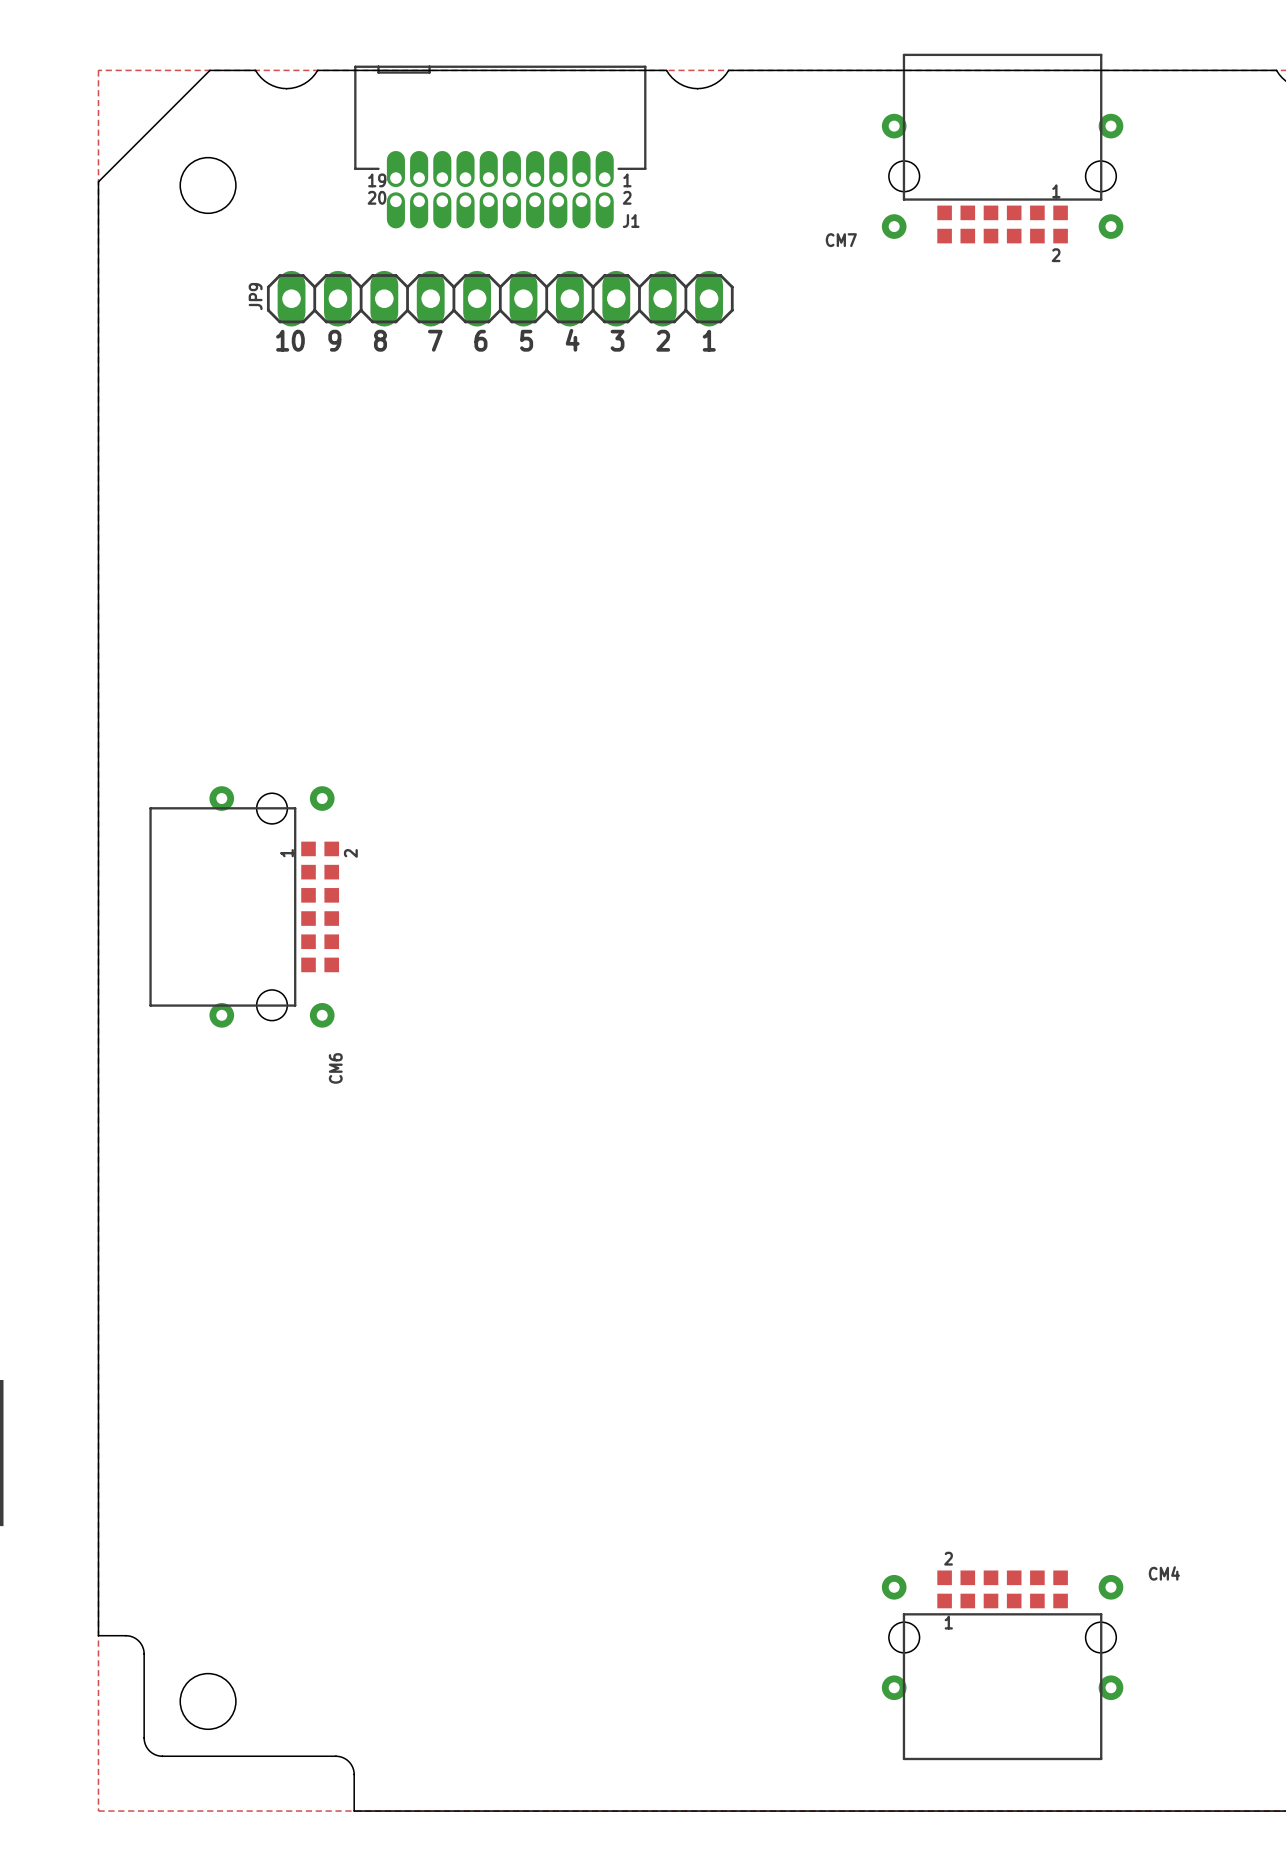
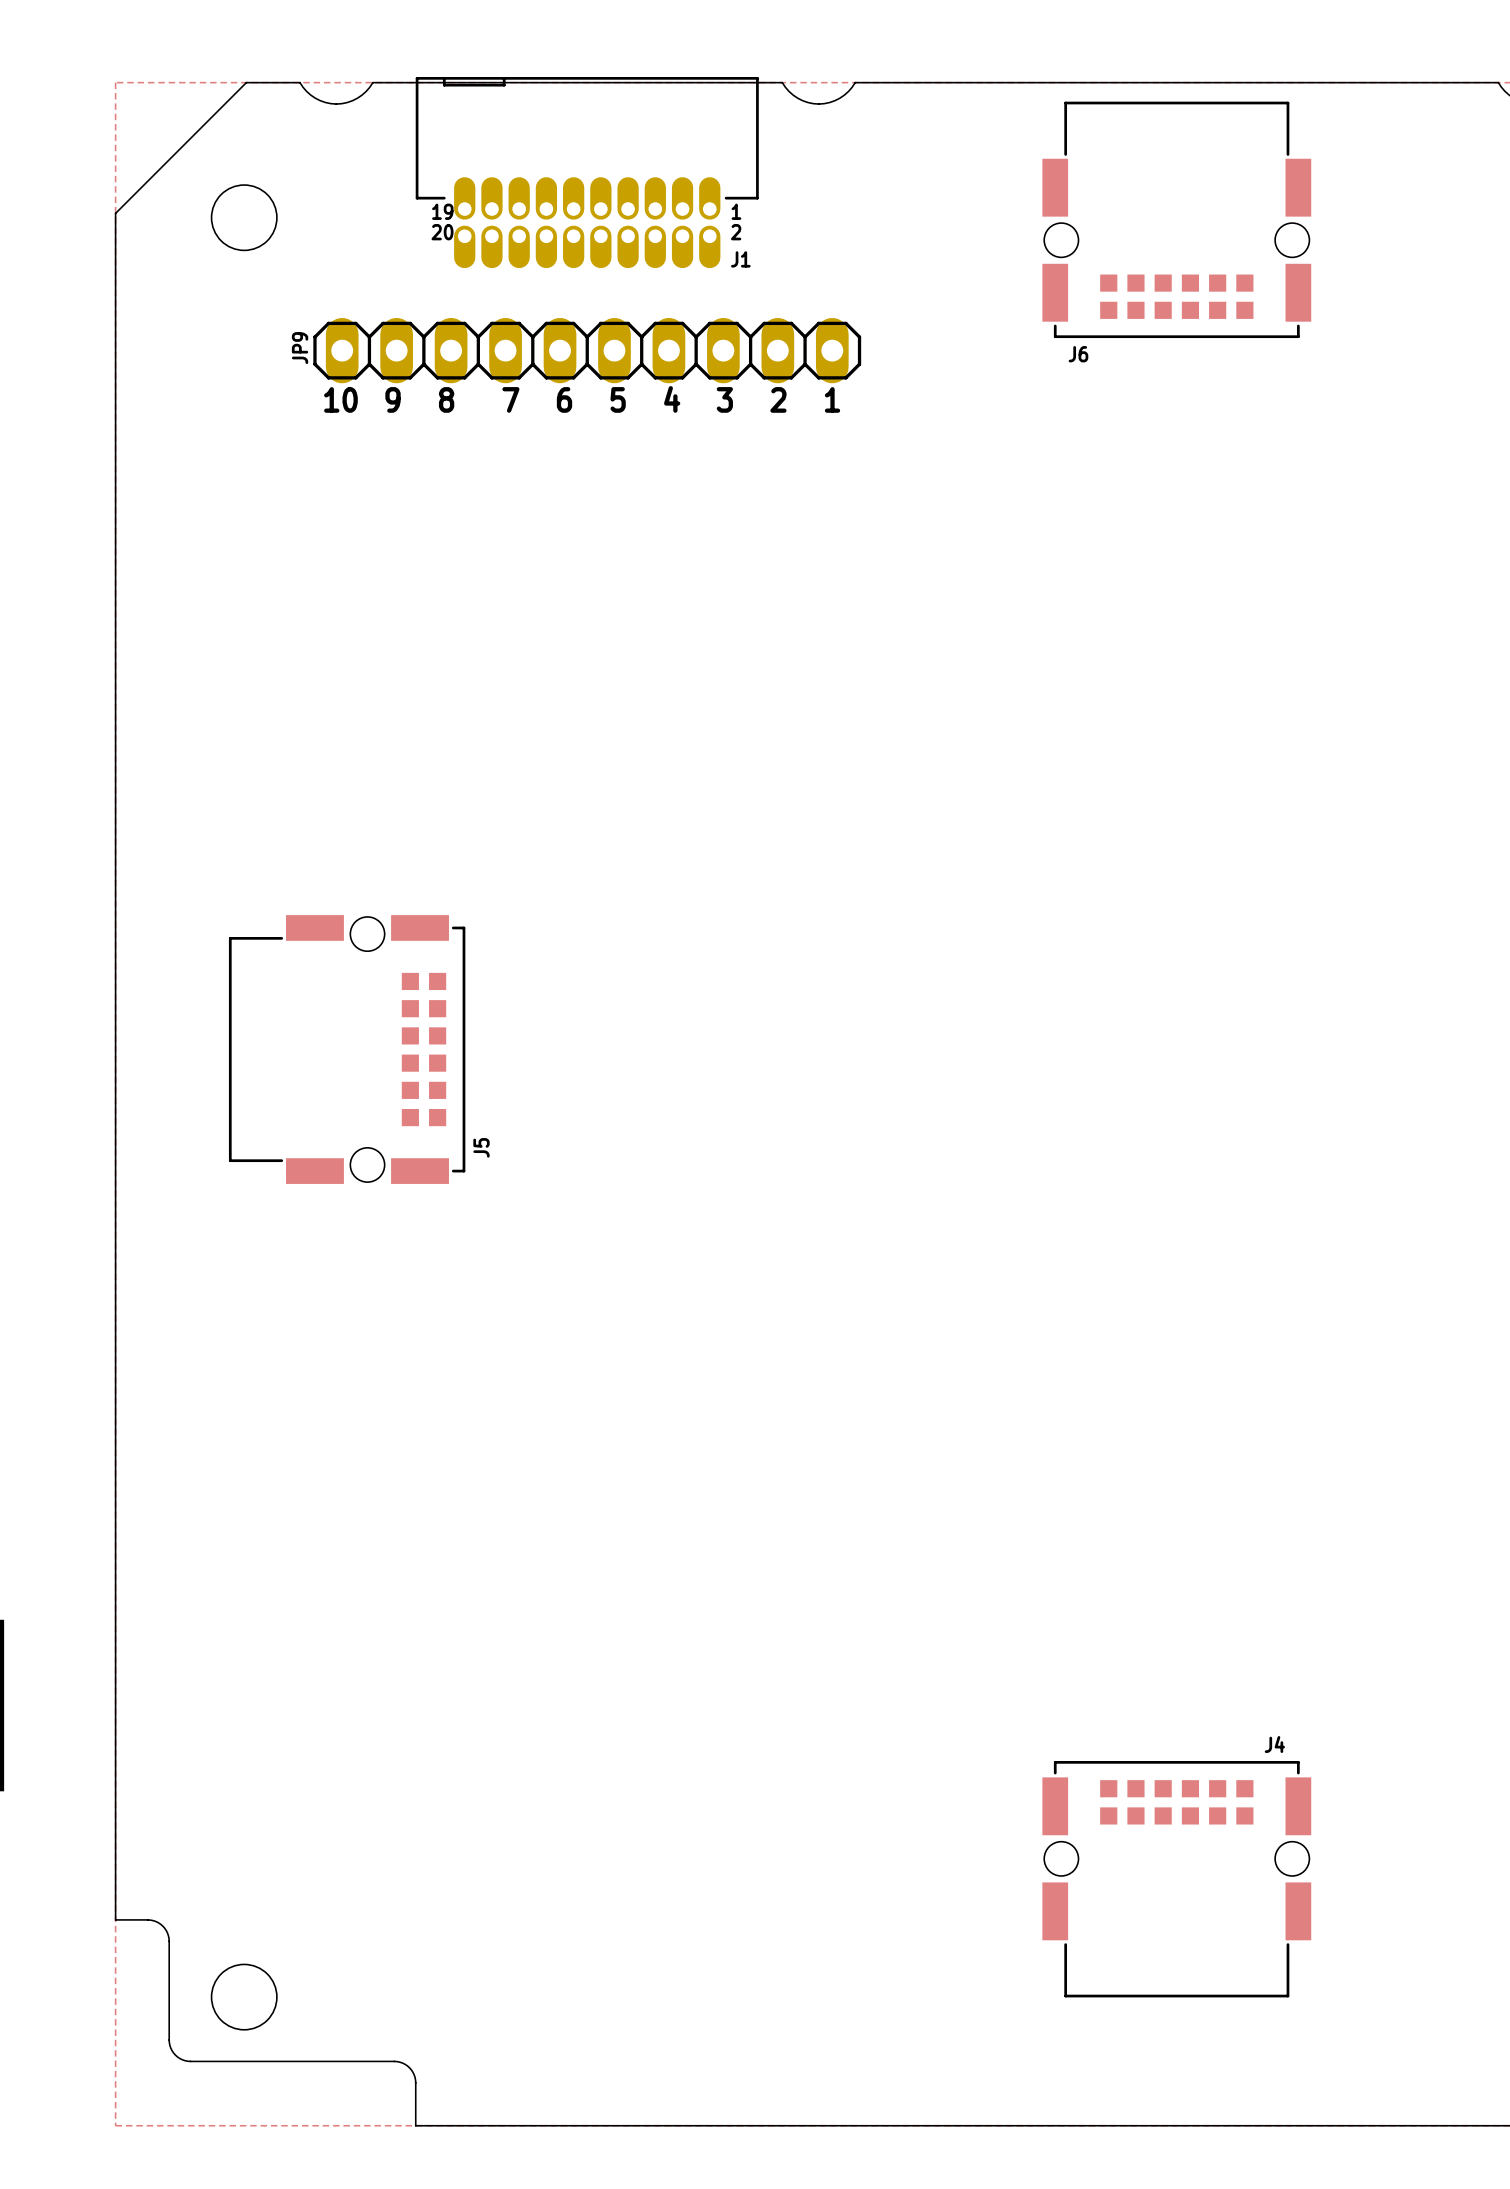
CM7: (1002, 148) -> none
J6: none -> (1176, 219)
J5: none -> (347, 1049)
CM6: (244, 906) -> none
J4: none -> (1176, 1879)
CM4: (1002, 1665) -> none

